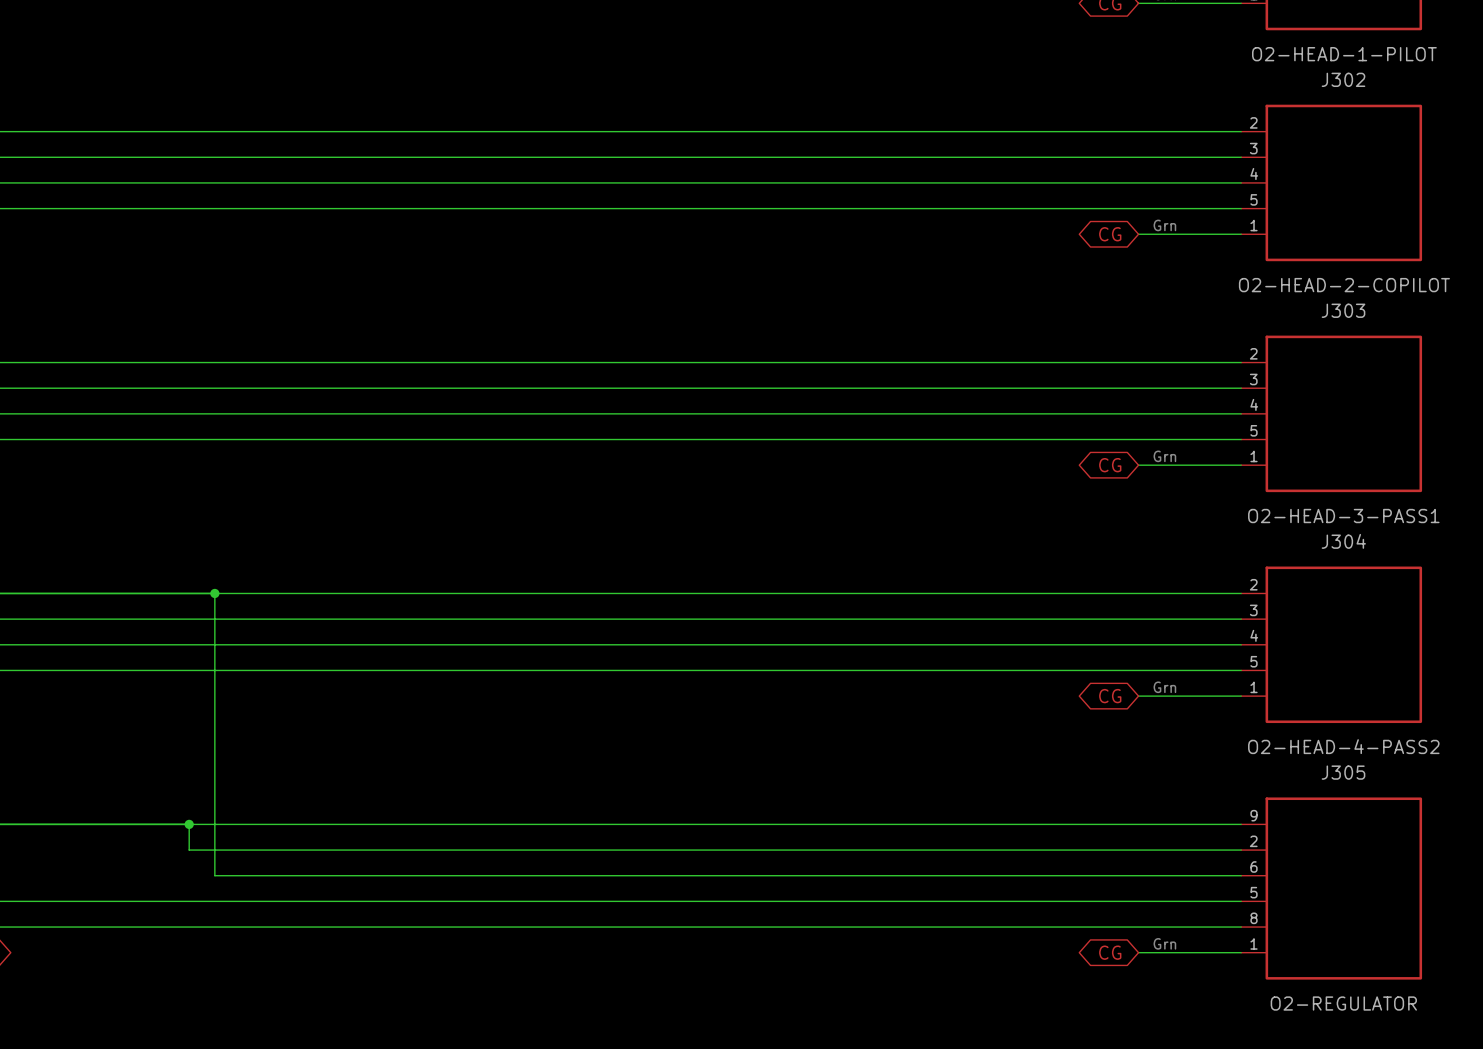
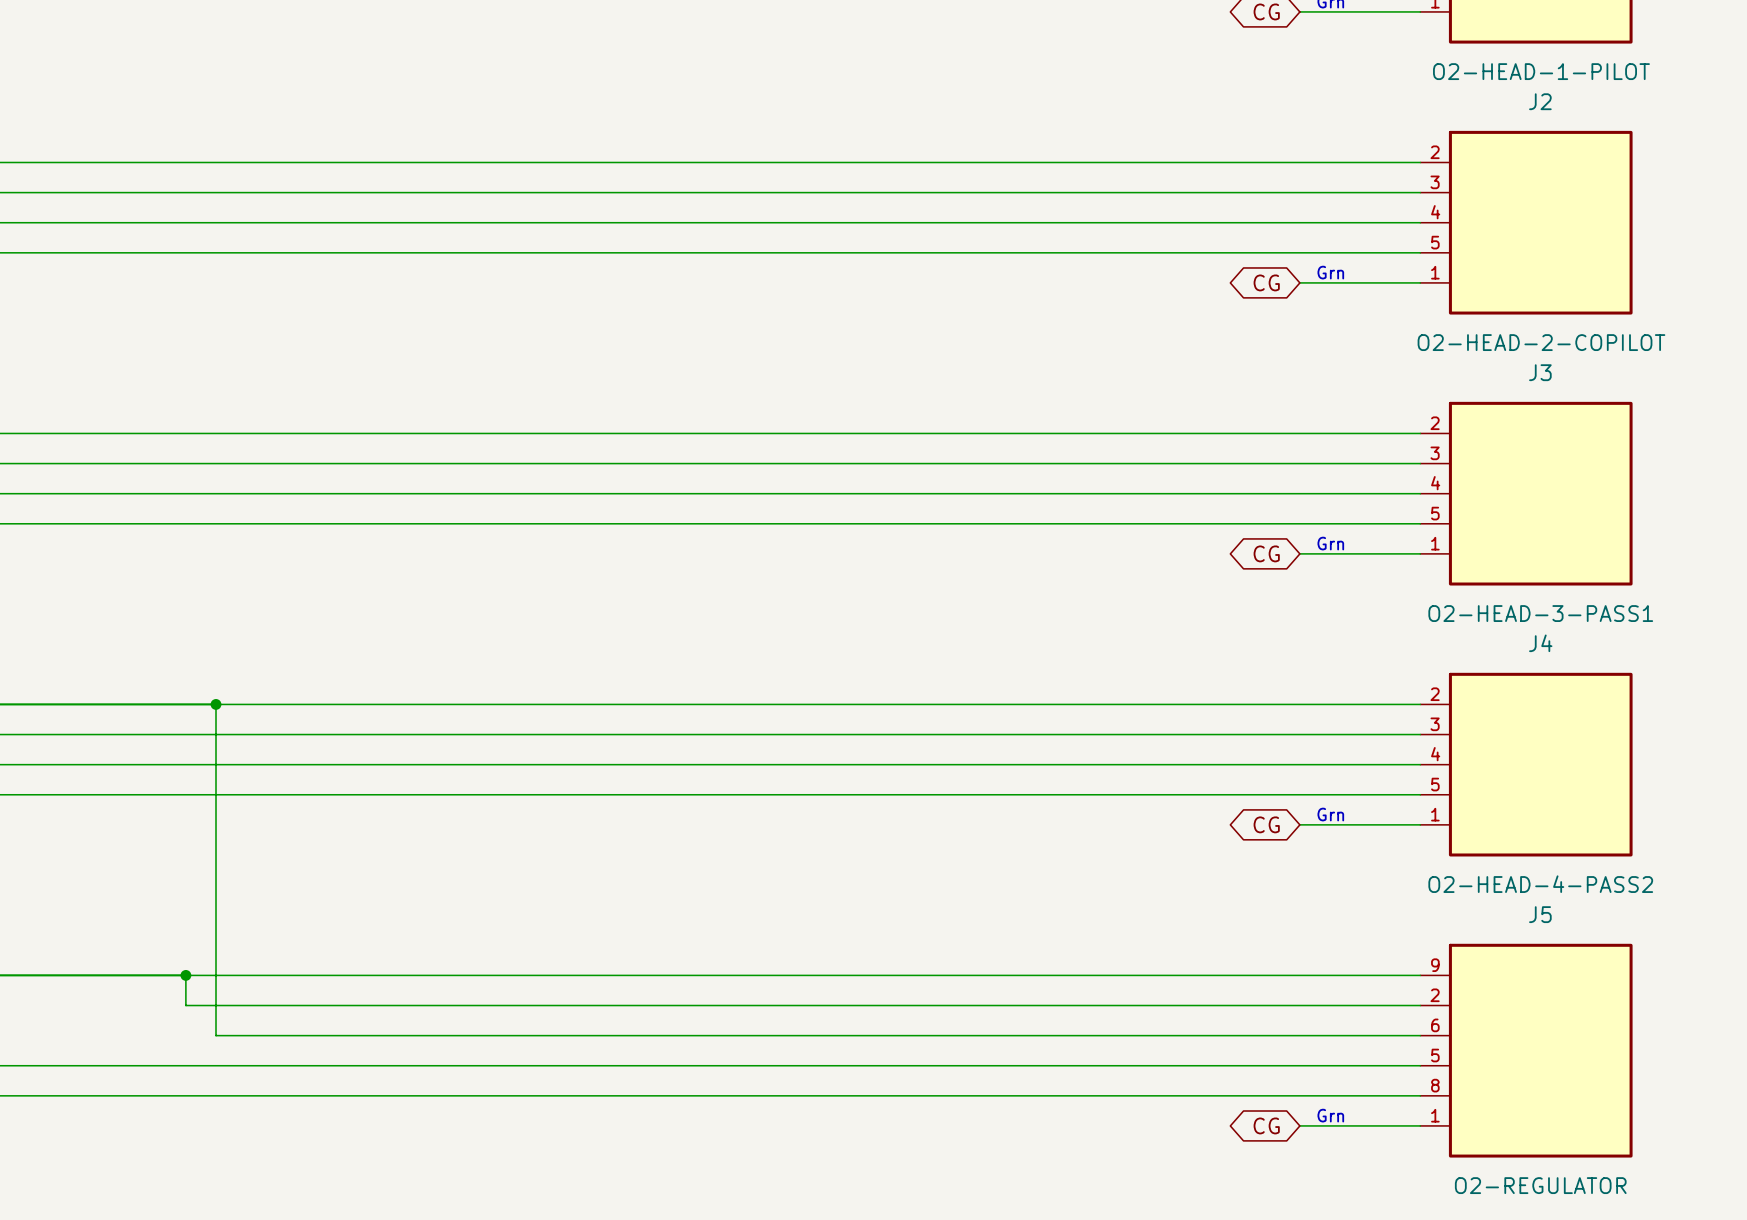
J302 name: J302 (1343, 79) -> J2 (1540, 101)
J303 name: J303 (1343, 310) -> J3 (1540, 372)
J304 name: J304 (1343, 541) -> J4 (1540, 643)
J305 name: J305 (1343, 772) -> J5 (1540, 914)

